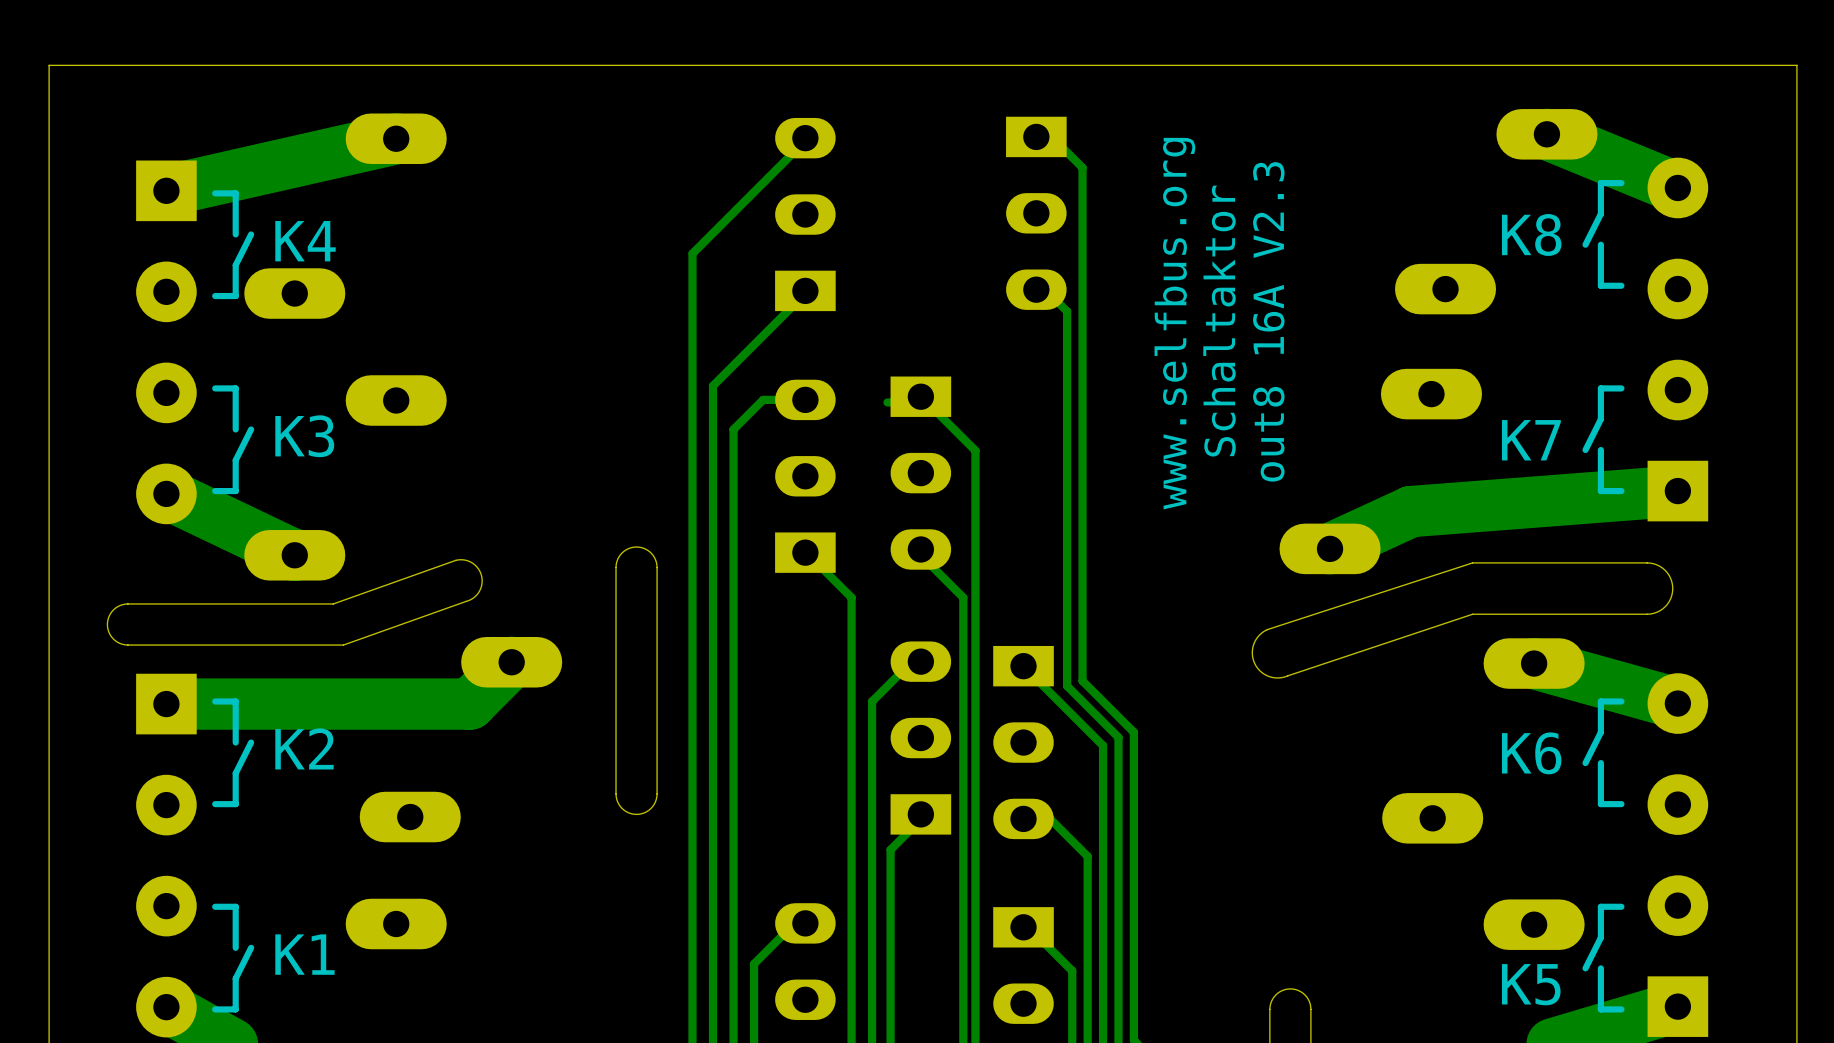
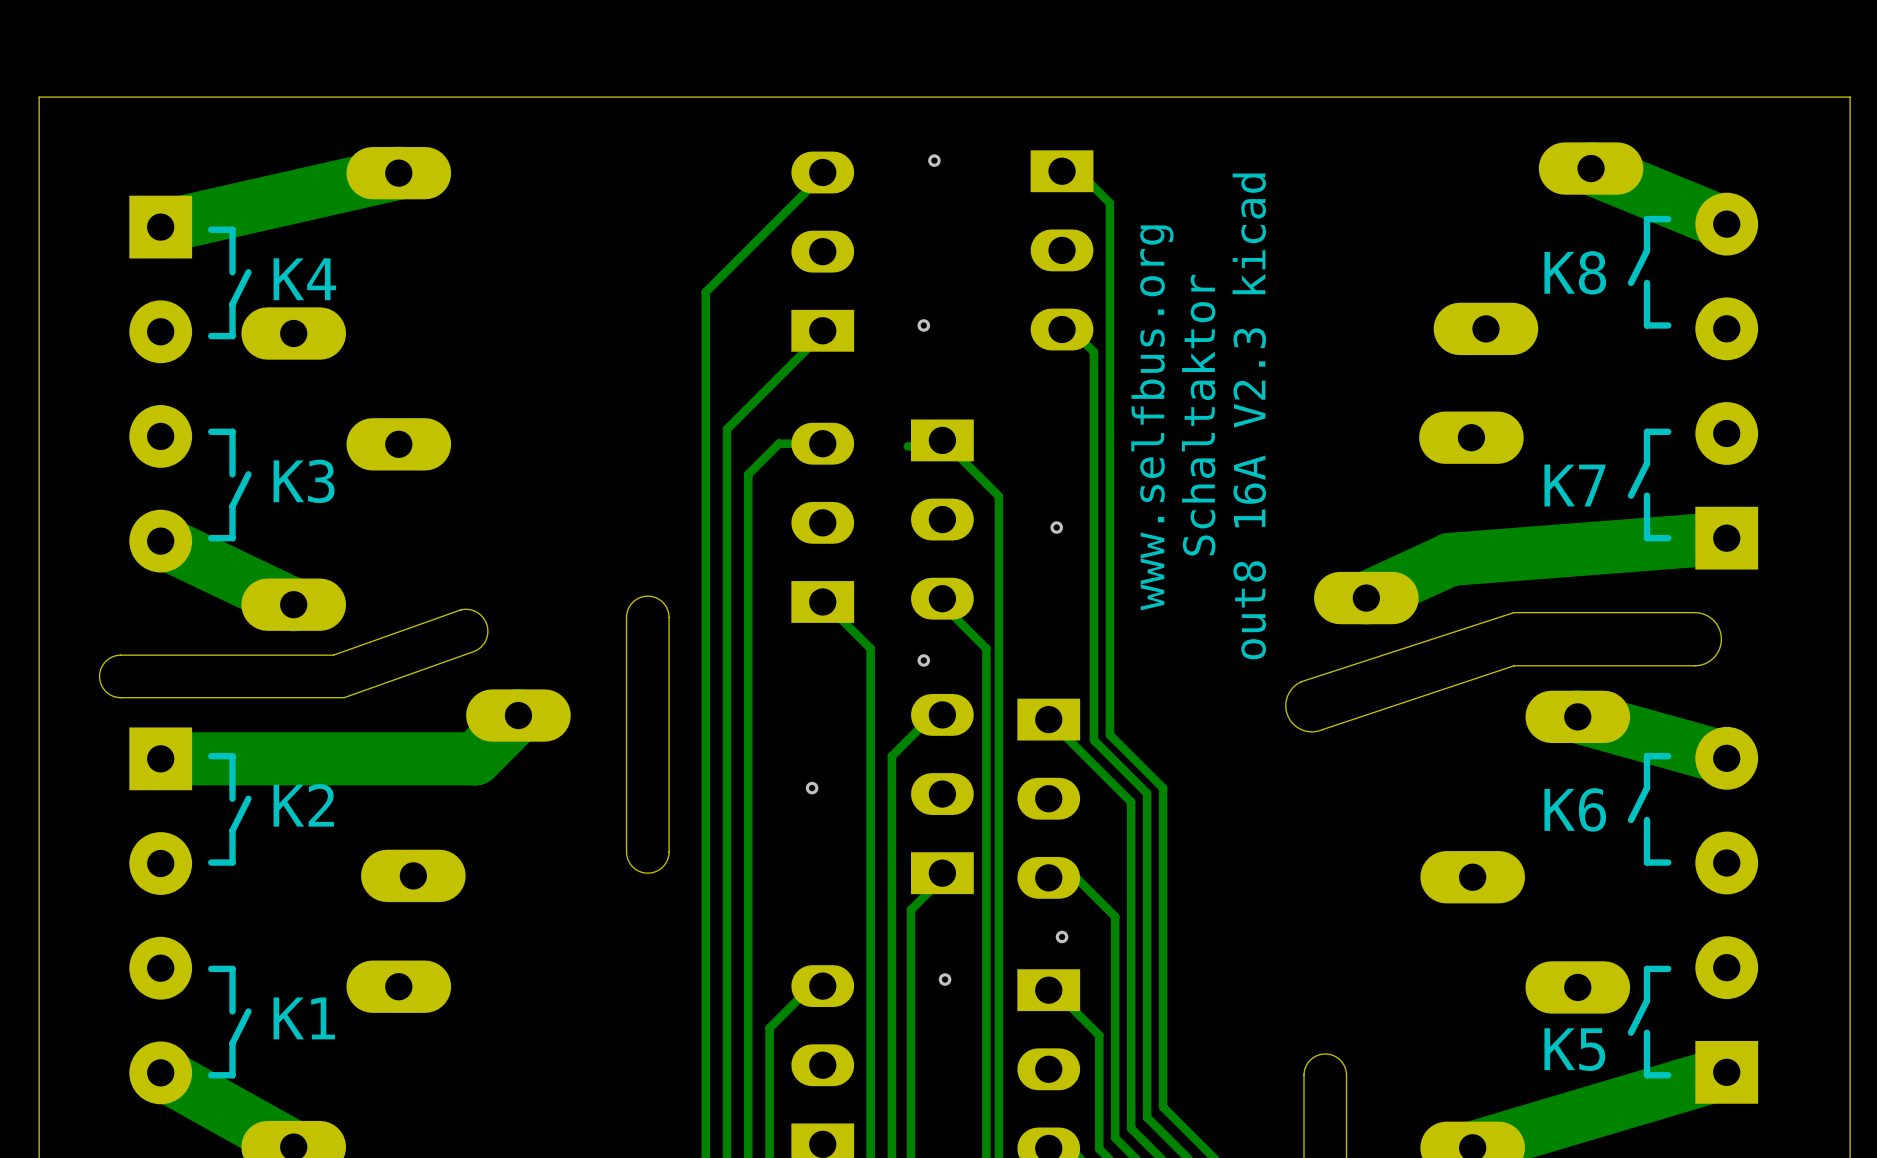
via: none -> (934, 160)
via: none -> (923, 325)
text position: Schaltaktor (1219, 321) -> Schaltaktor (1198, 415)
text: out8 16A V2.3 (1268, 321) -> out8 16A V2.3 kicad (1249, 416)
text position: www.selfbus.org (1174, 323) -> www.selfbus.org (1152, 417)
via: none -> (1056, 527)
via: none -> (923, 660)
via: none -> (812, 788)
via: none -> (1062, 936)
via: none -> (945, 979)

